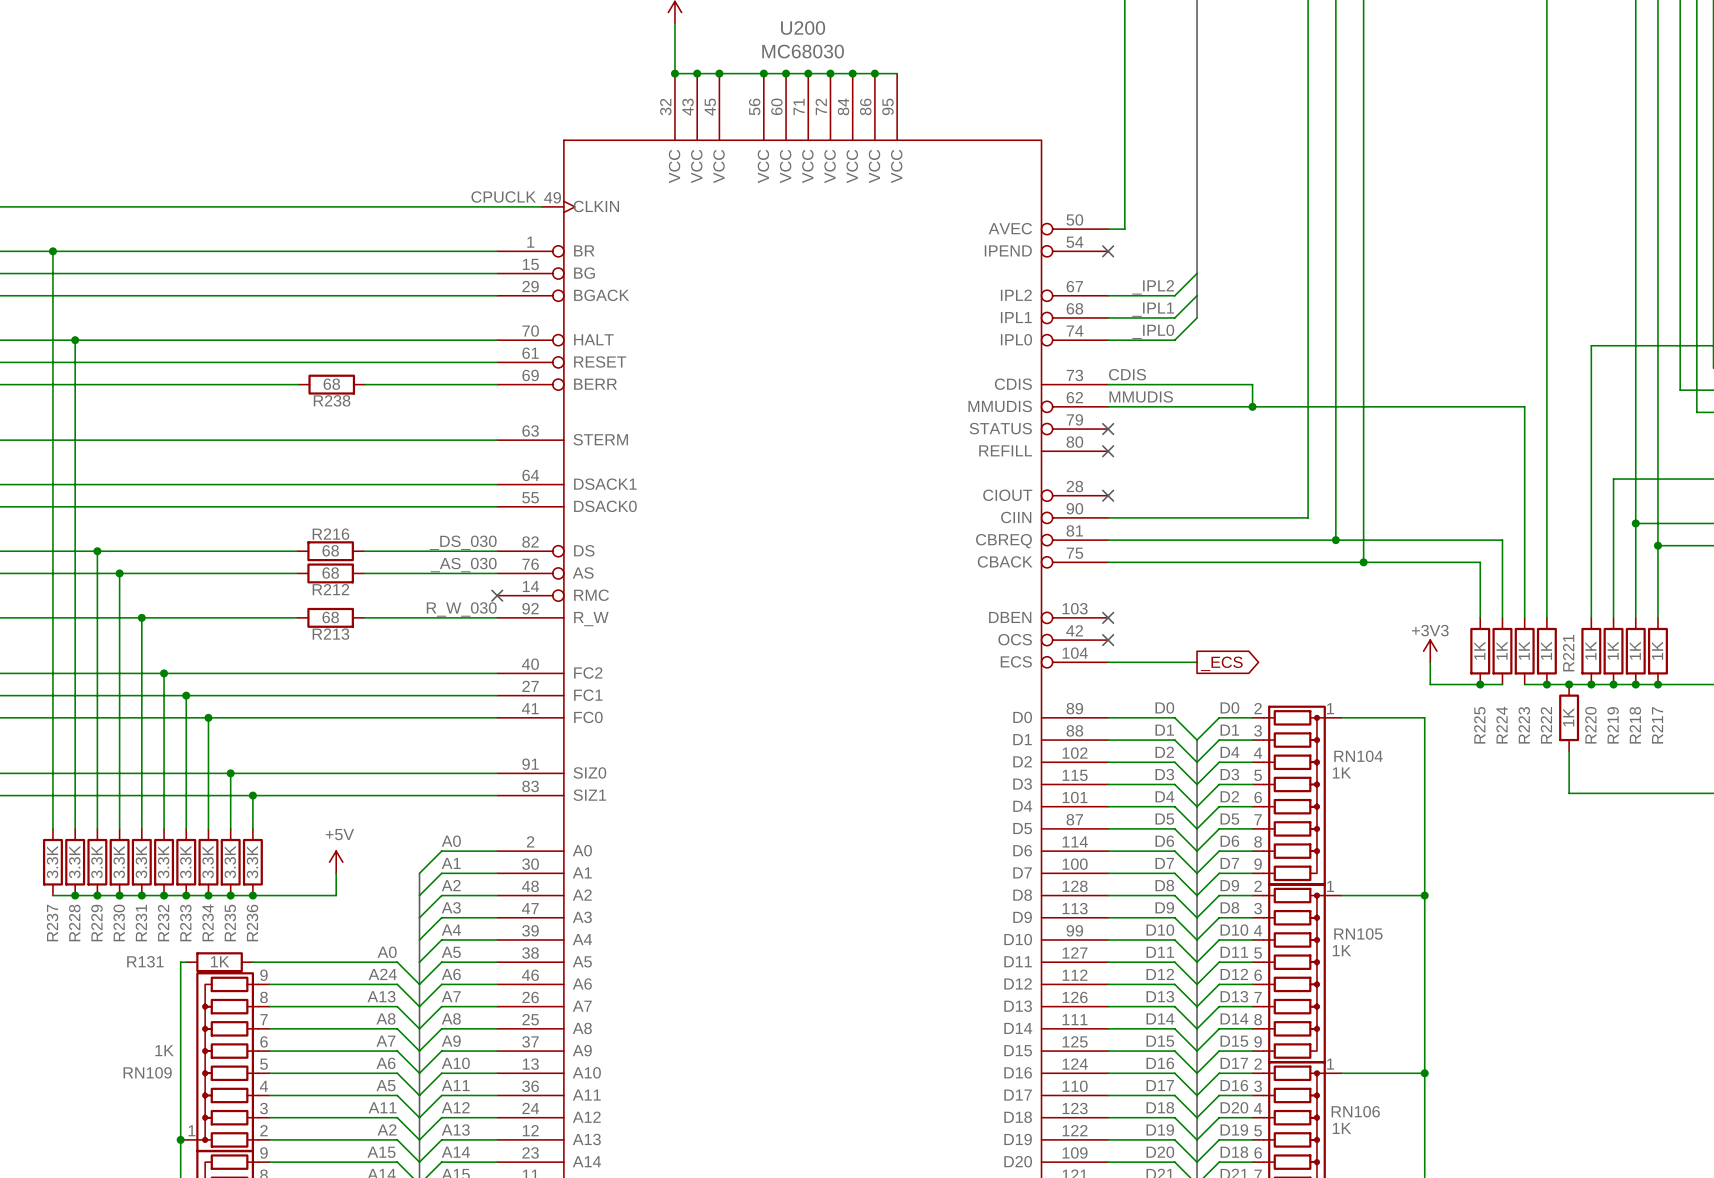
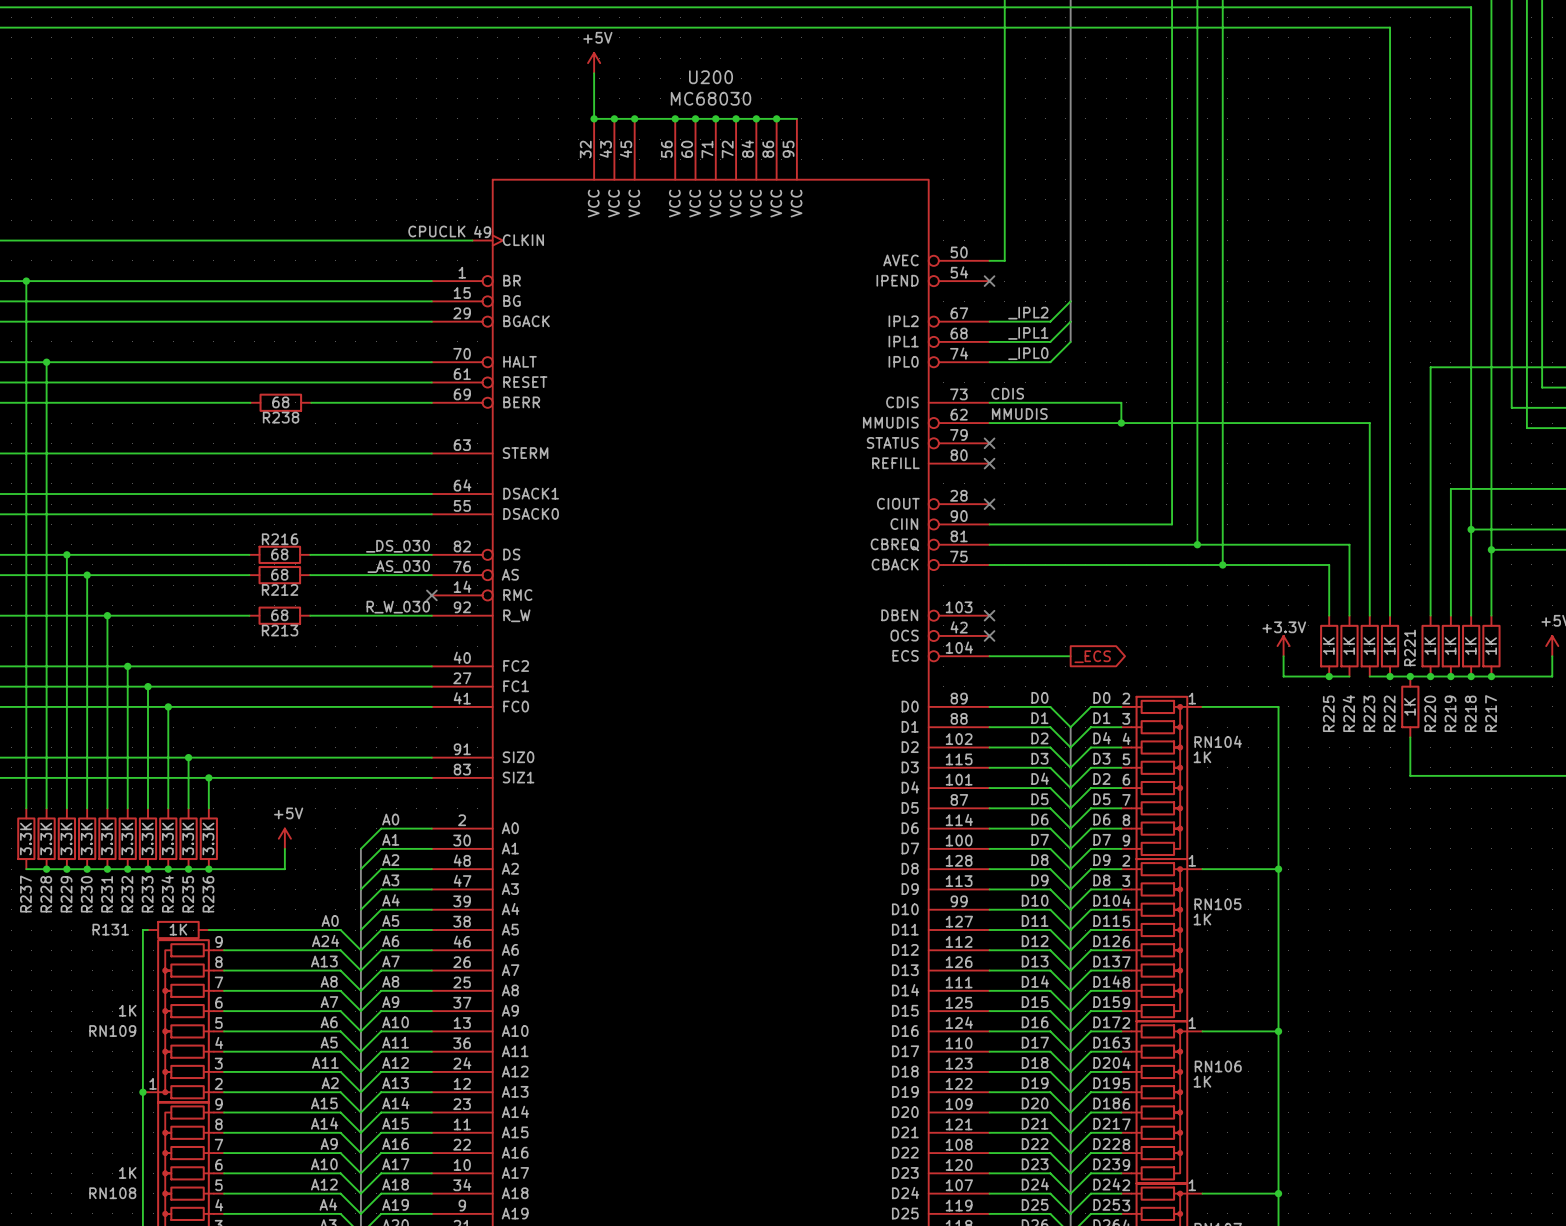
power symbol: +3V3 (1430, 651) -> +3.3V (1283, 646)

